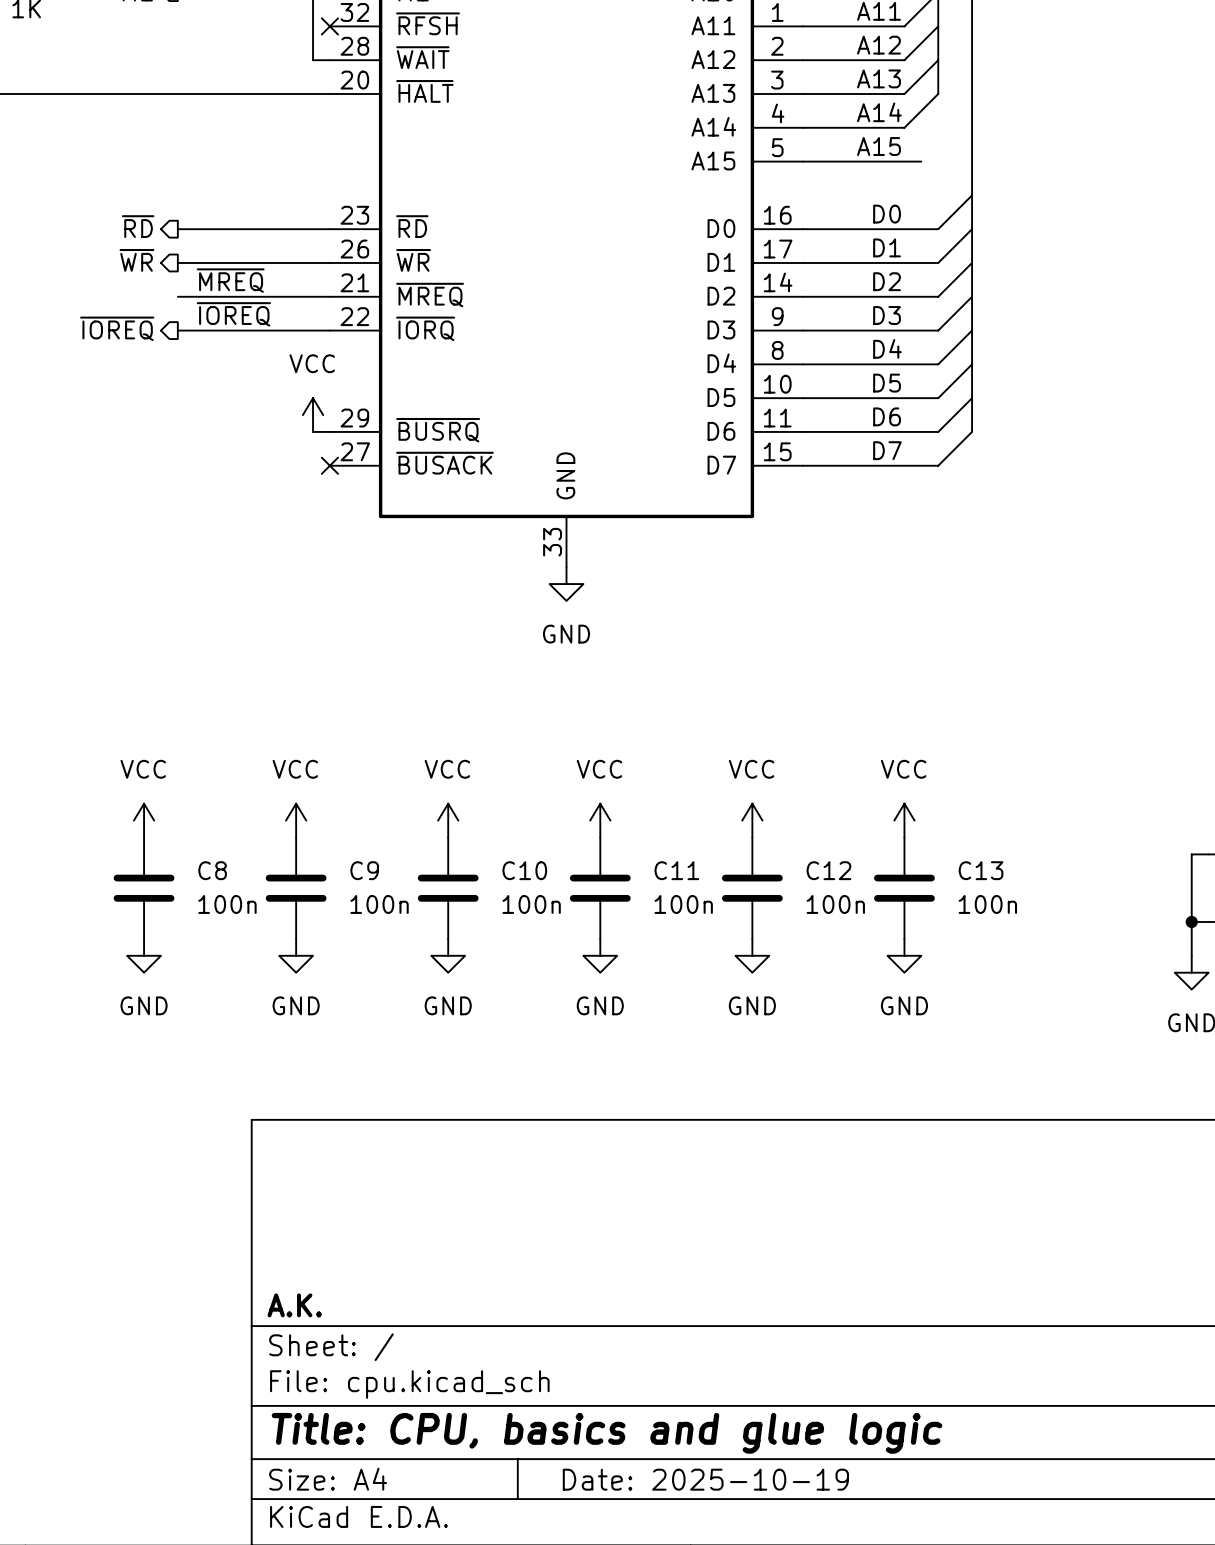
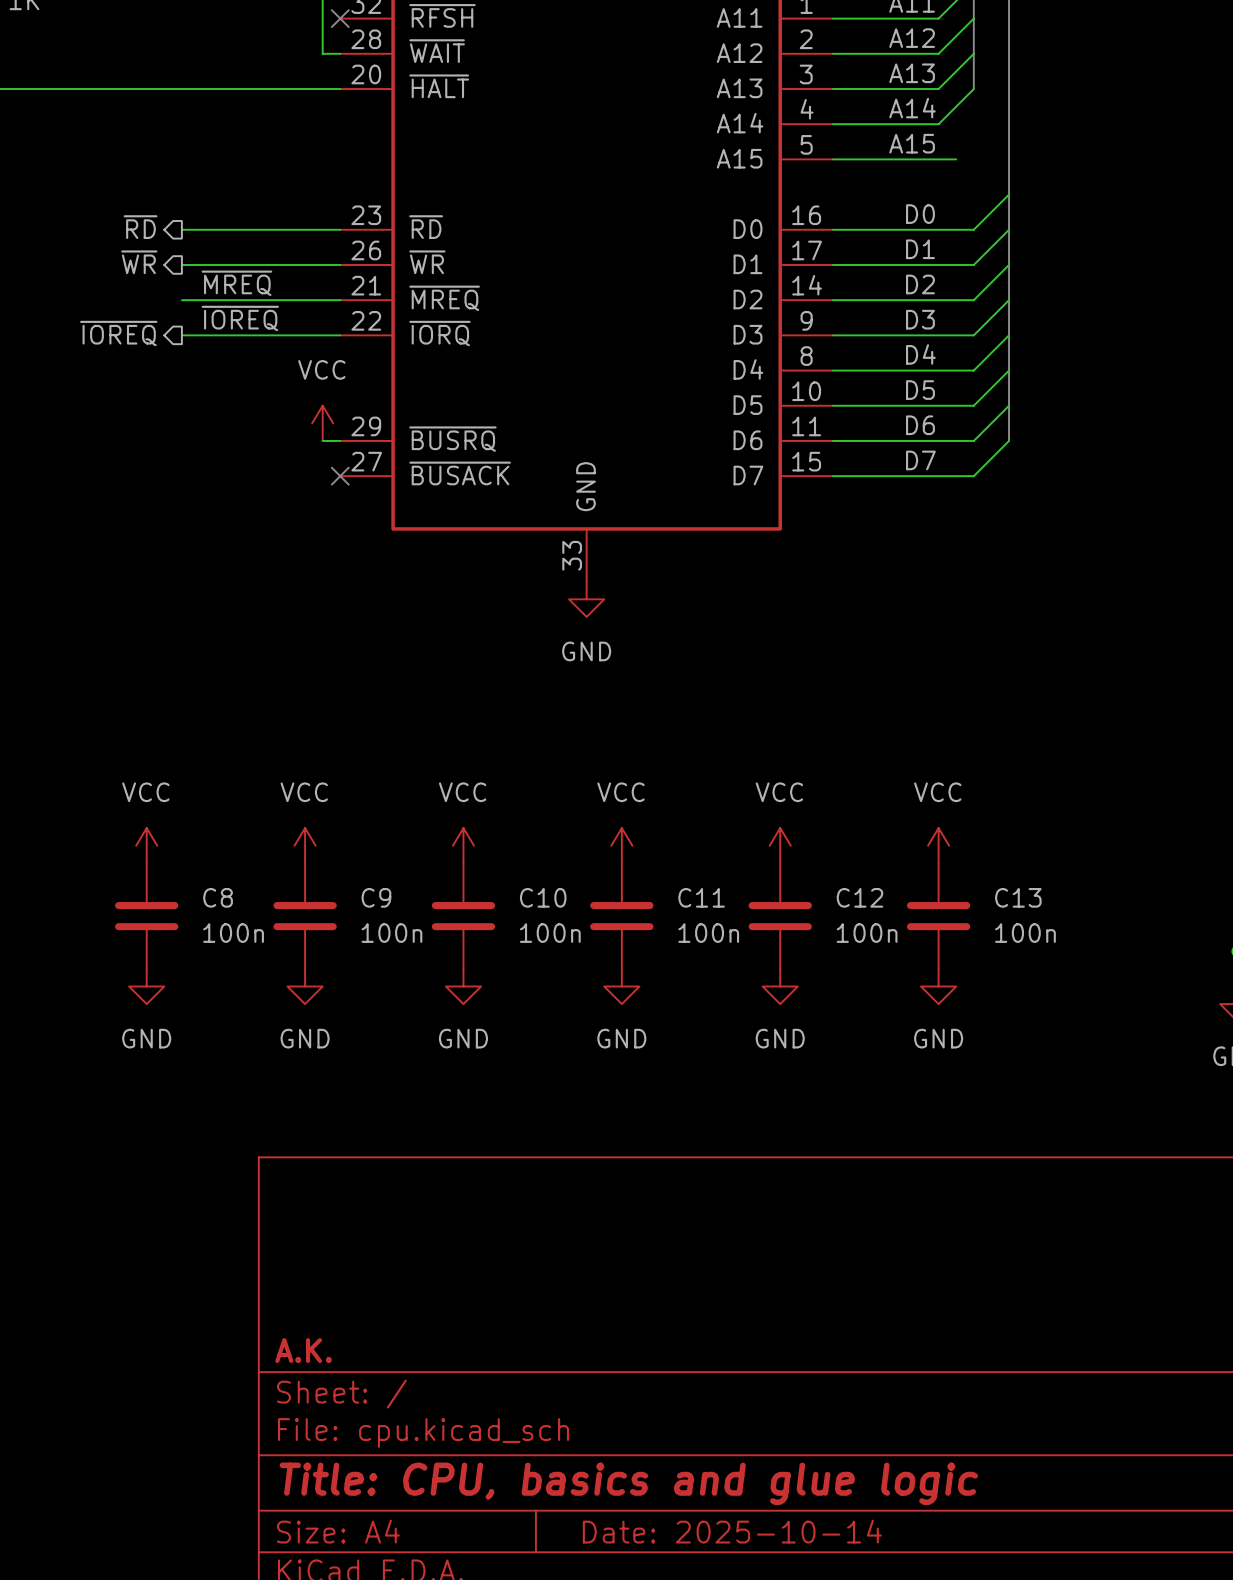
title block: Date: 2025-10-19 (705, 1479) -> Date: 2025-10-14 (732, 1531)

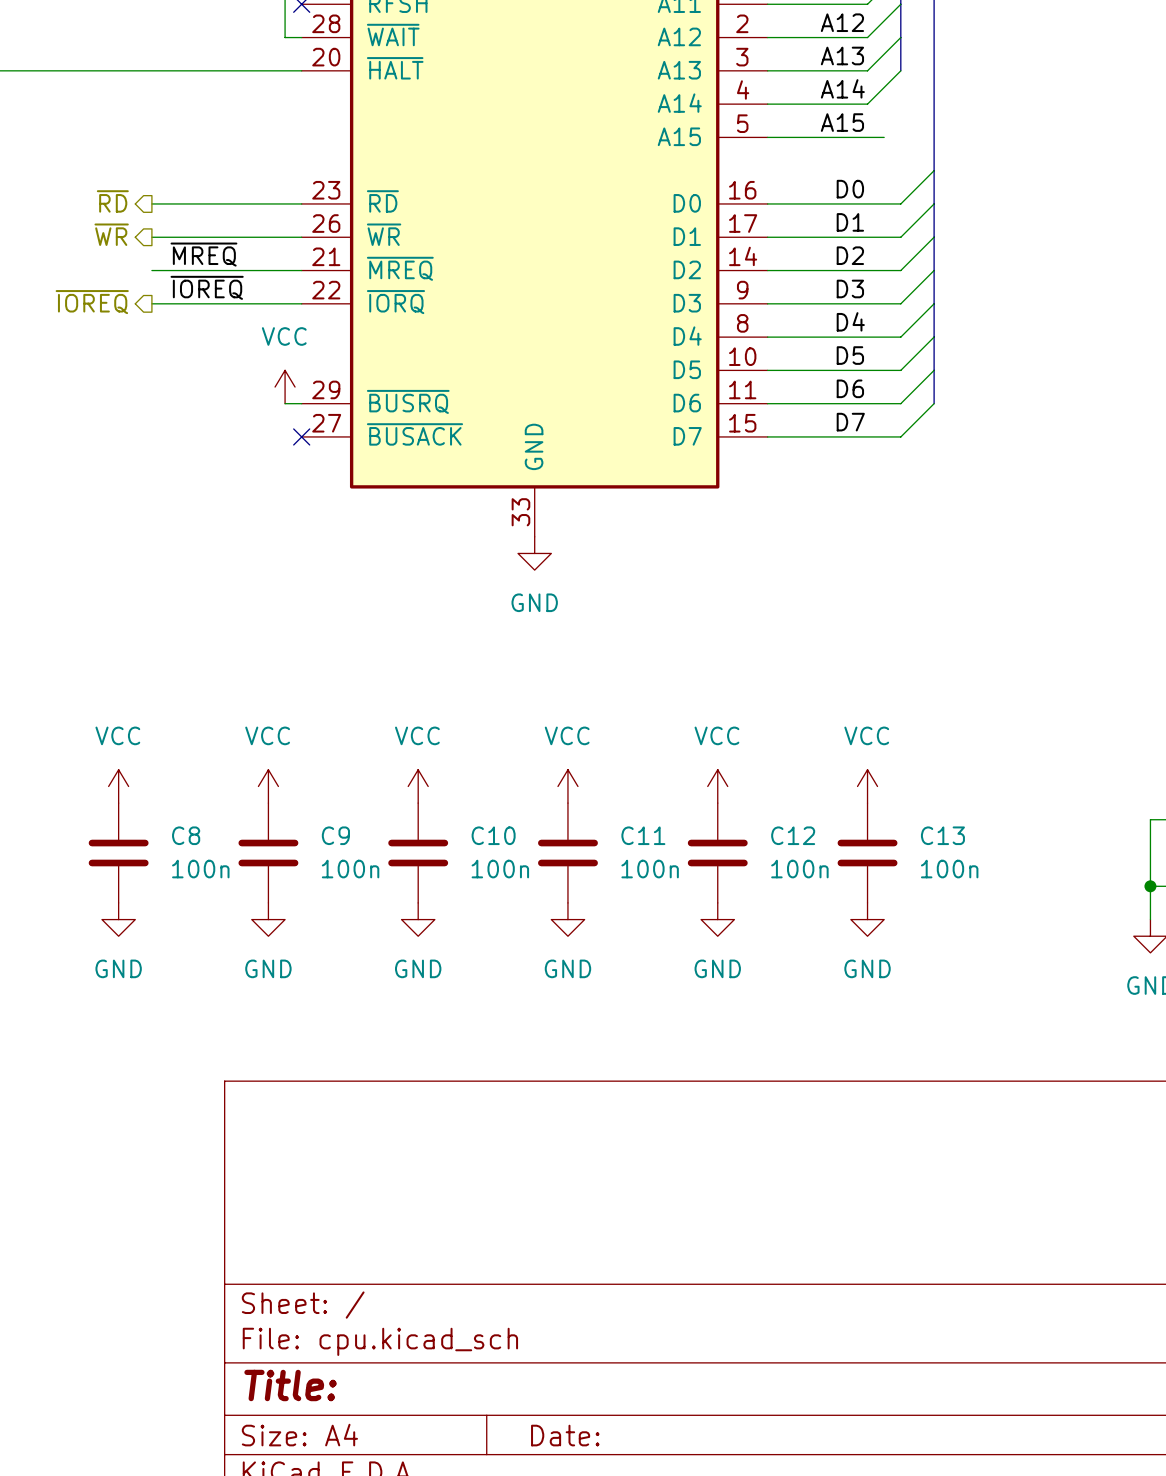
title block: A.K. (303, 1350) -> none
title block: Title: CPU, basics and glue logic (628, 1483) -> Title: (290, 1385)
title block: Date: 2025-10-14 (732, 1531) -> Date: (565, 1435)

